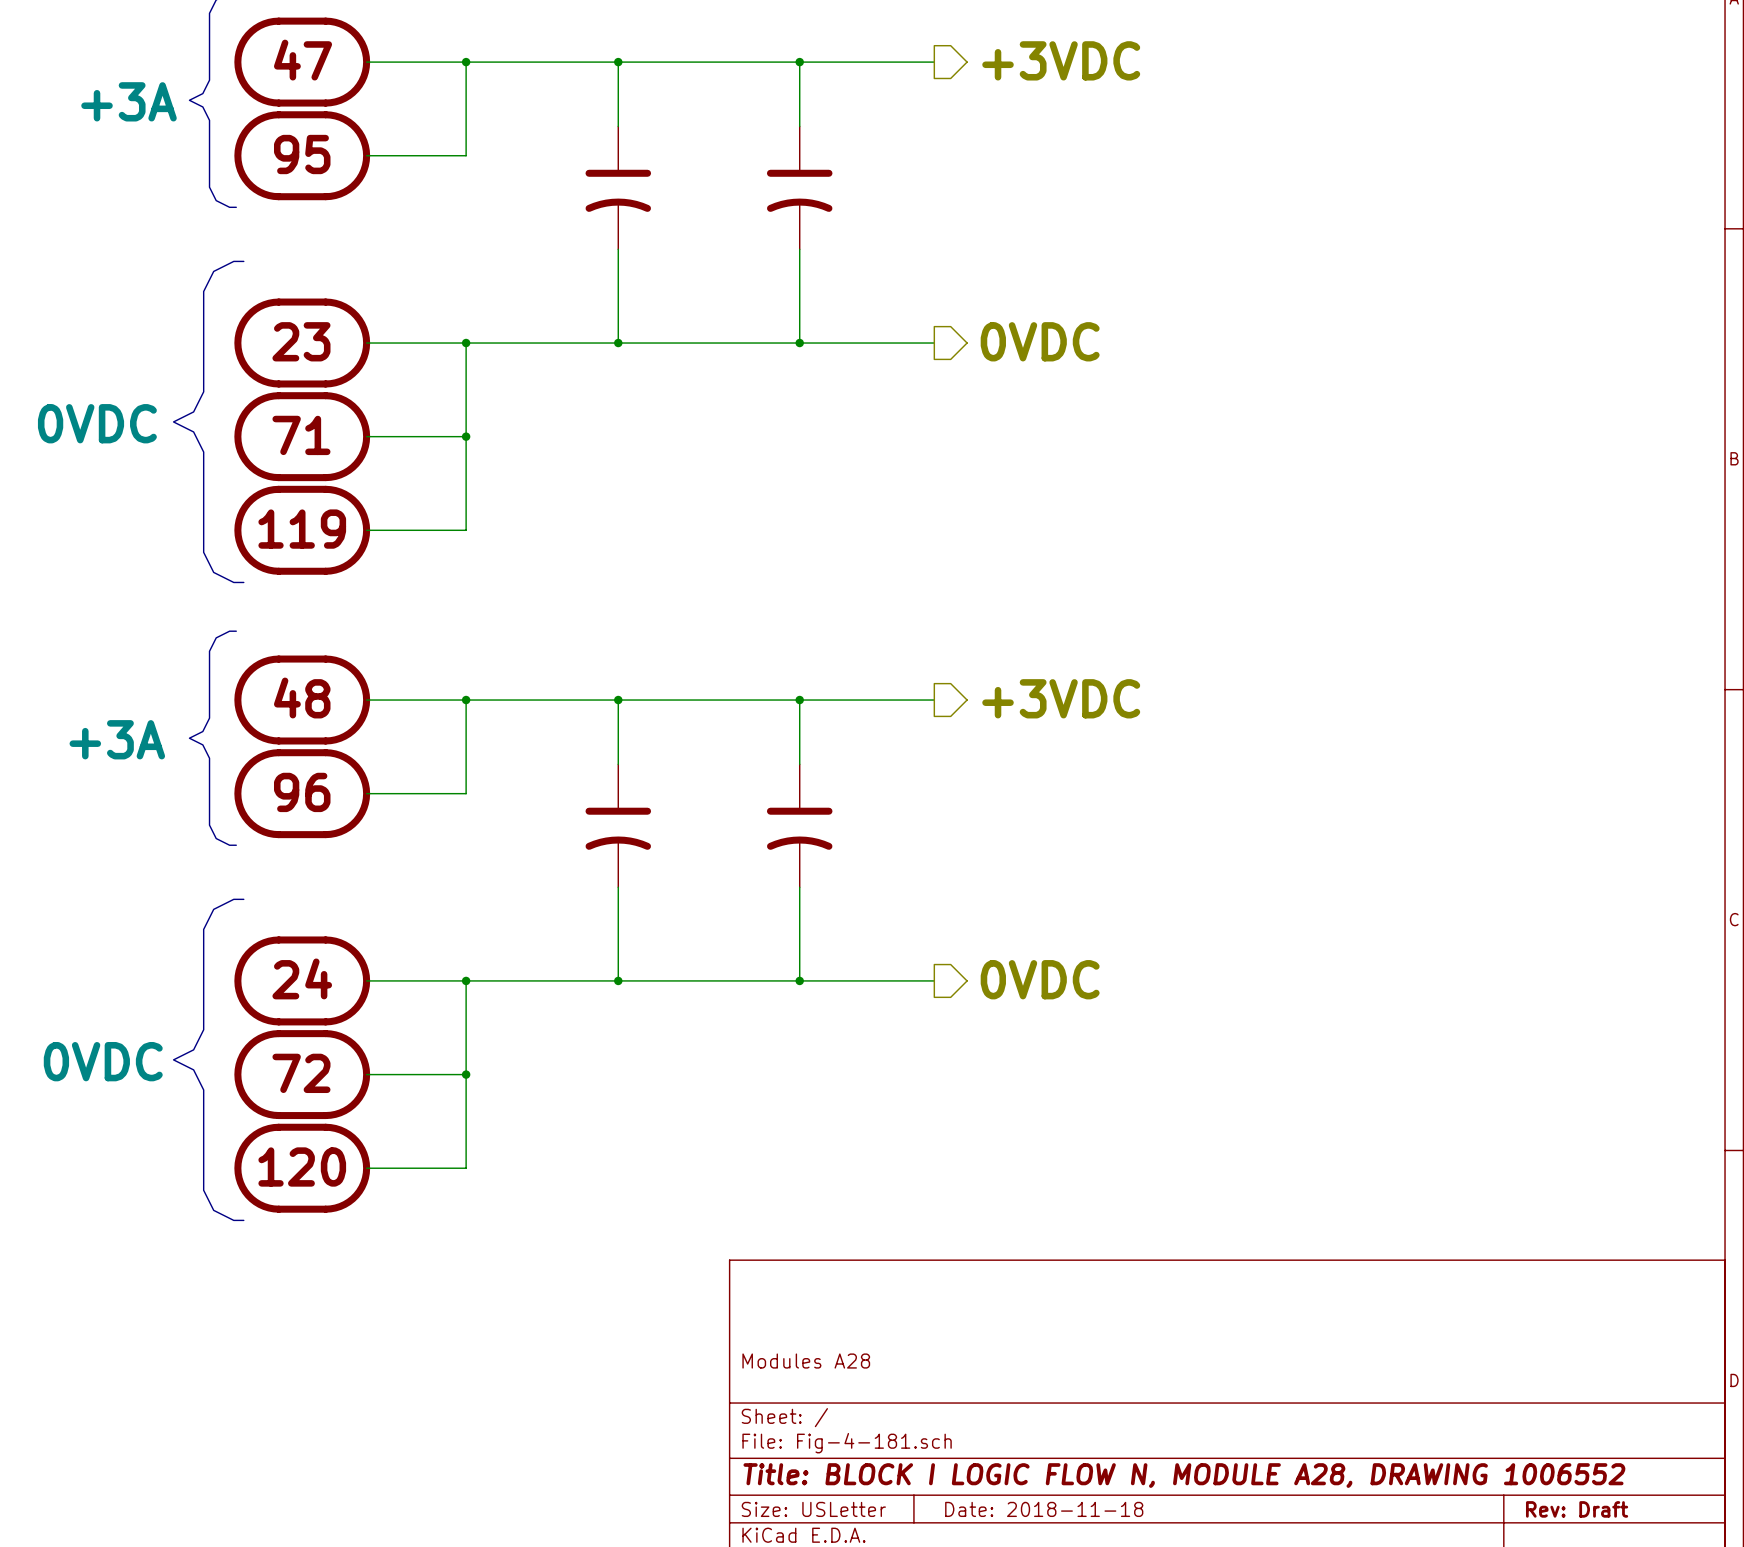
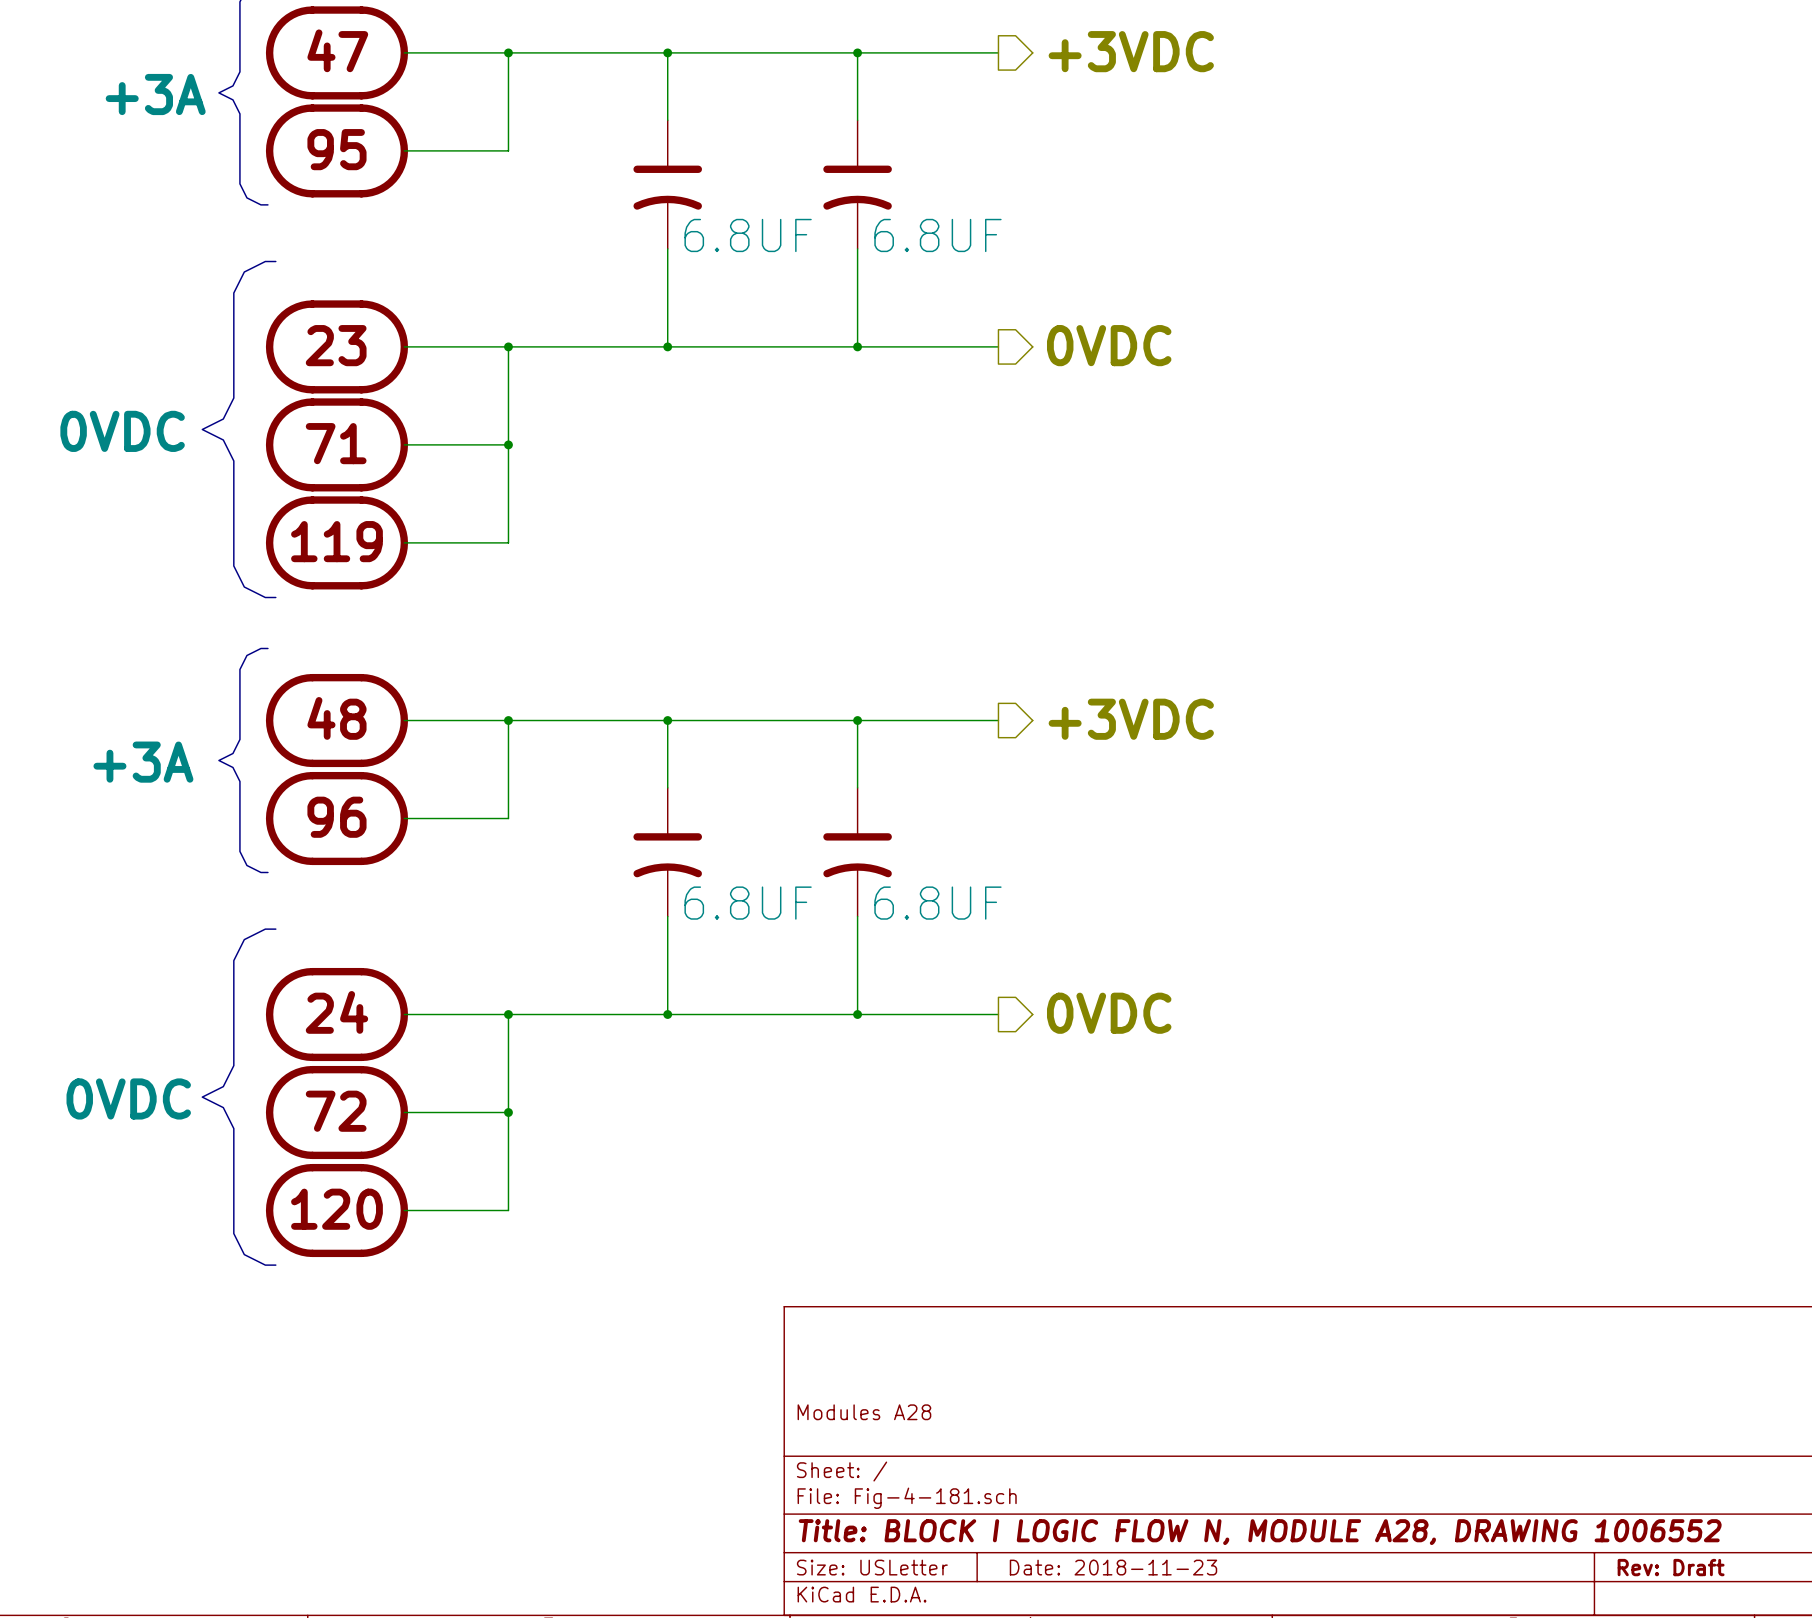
part value: none -> 6.8UF (748, 235)
part value: none -> 6.8UF (937, 235)
part value: none -> 6.8UF (748, 903)
part value: none -> 6.8UF (937, 903)
title block: Date: 2018-11-18 (1044, 1509) -> Date: 2018-11-23 (1113, 1567)

